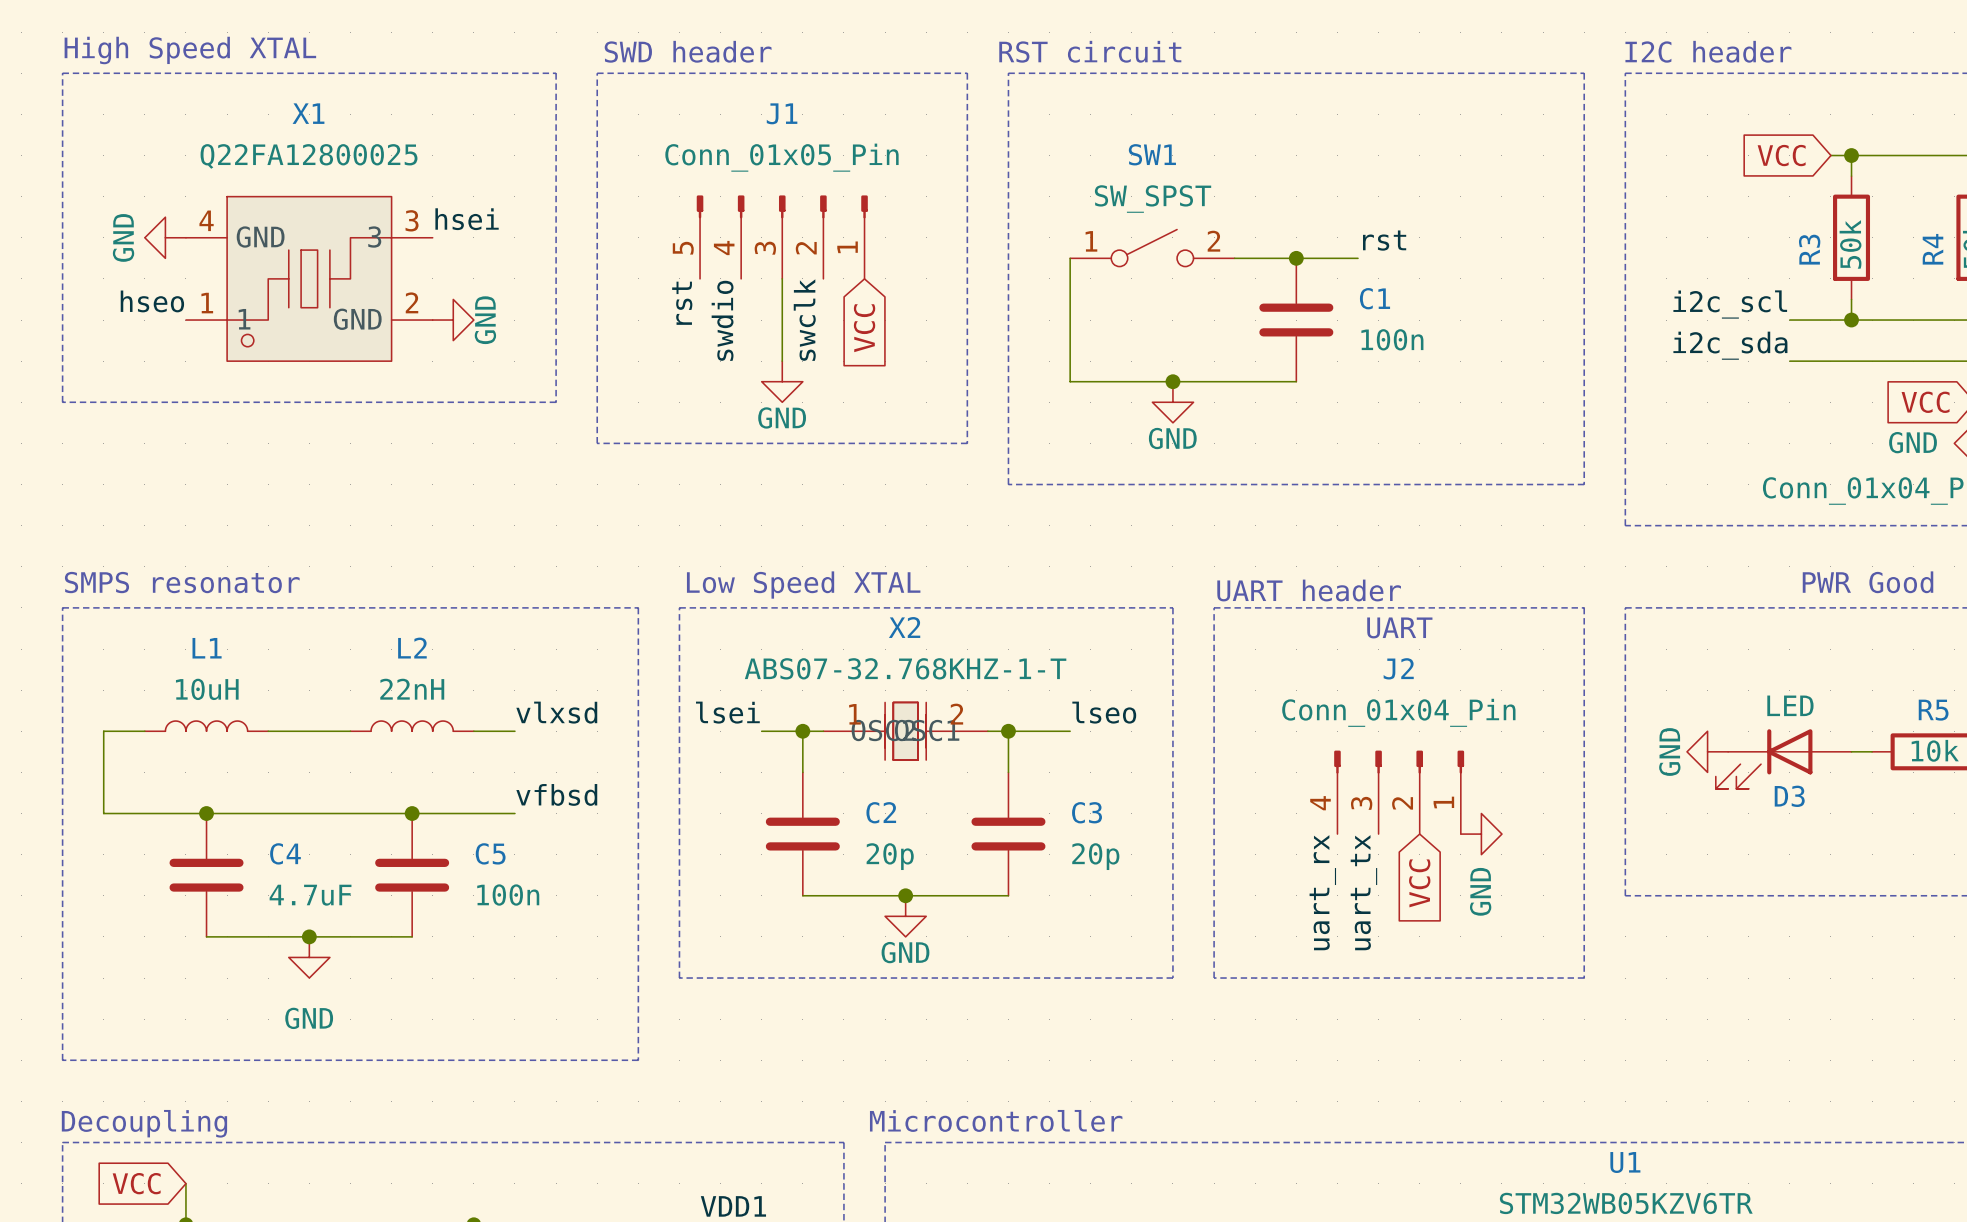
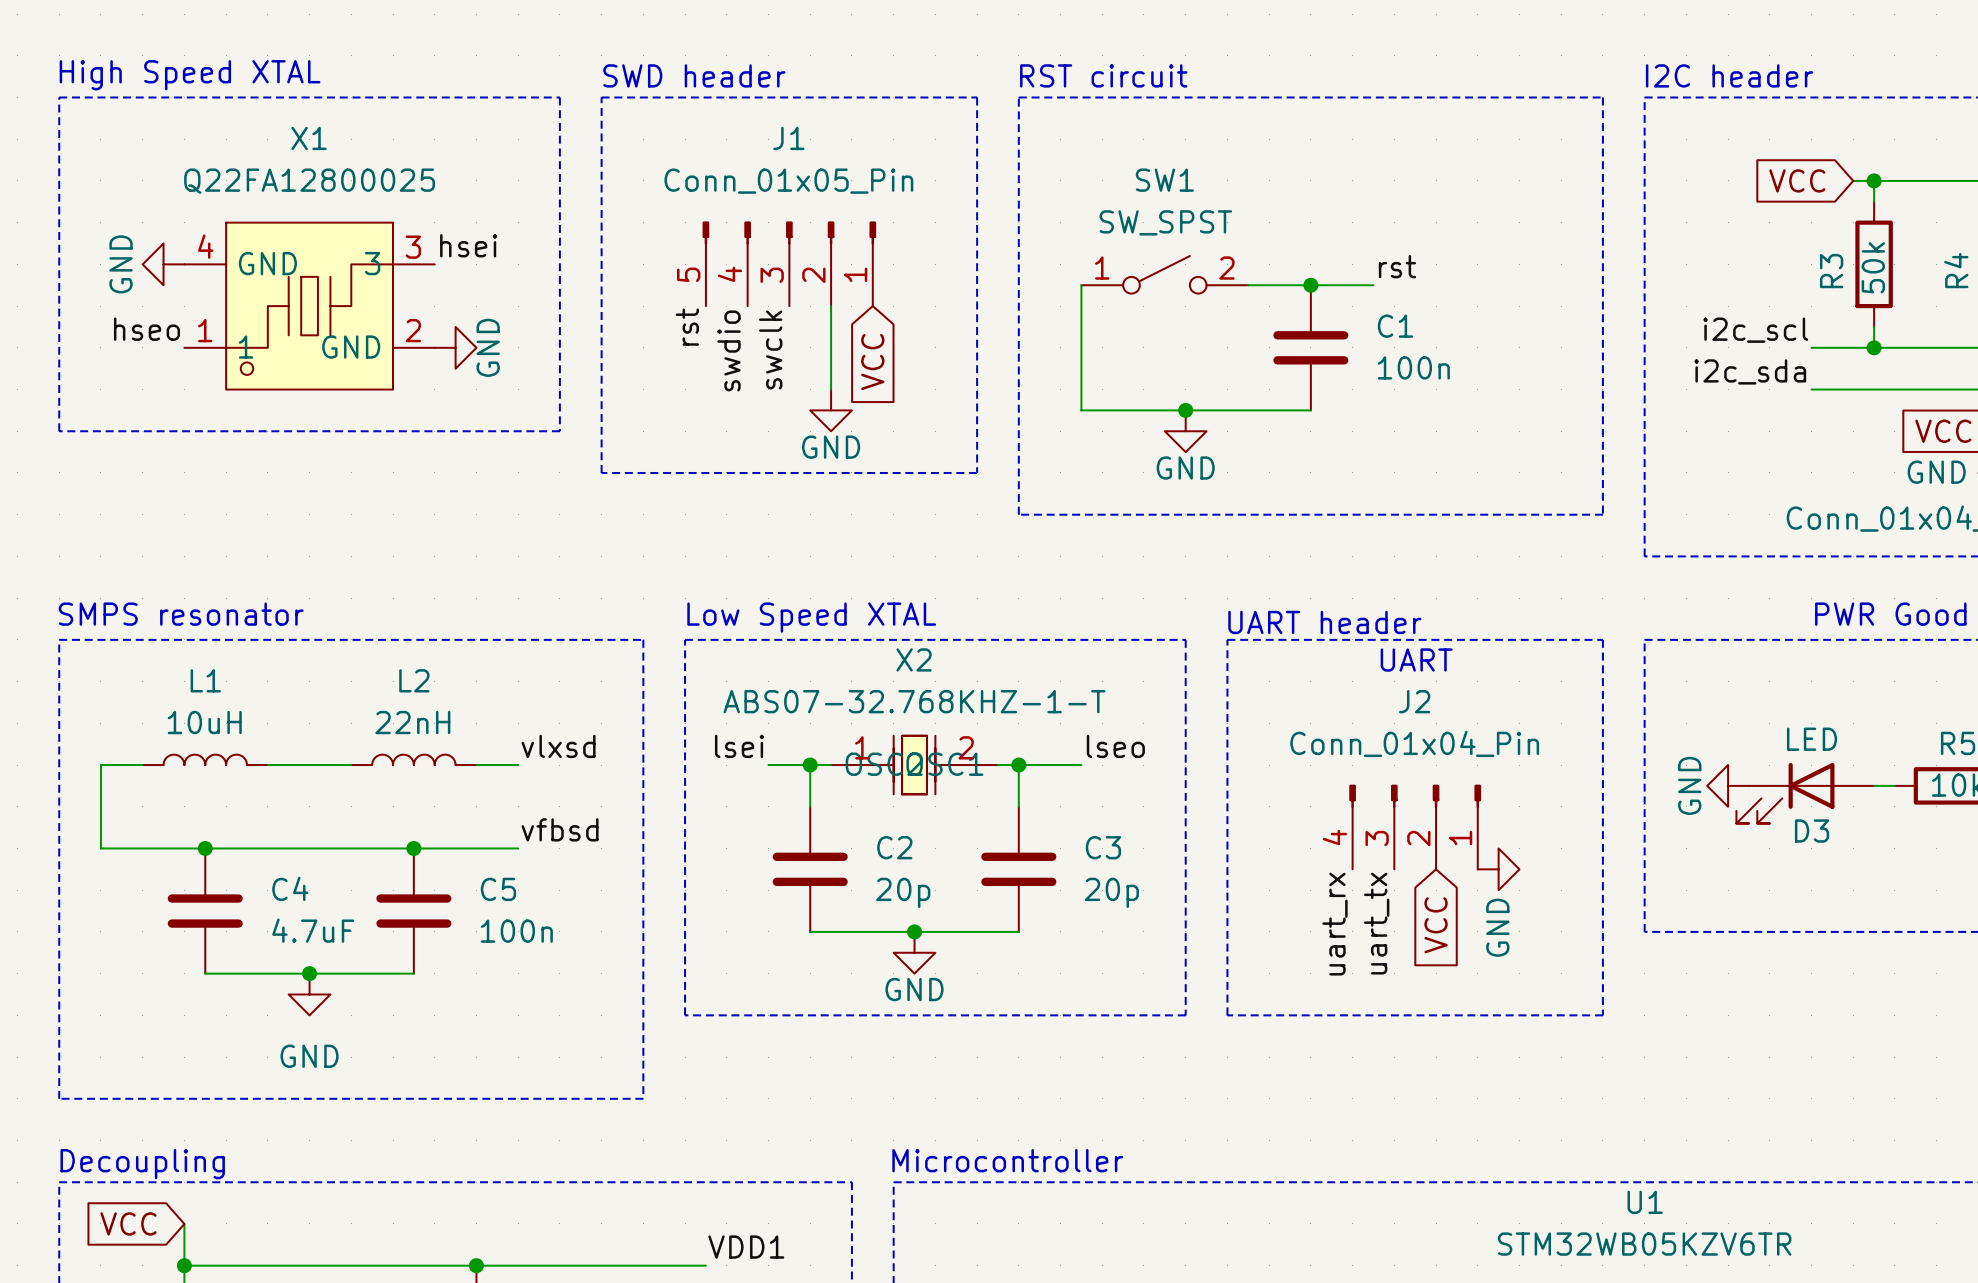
wire: (782, 278) (782, 361) -> (831, 306) (831, 389)
label position: swclk (804, 320) -> swclk (770, 349)
power symbol position: GND (782, 381) -> GND (831, 410)

